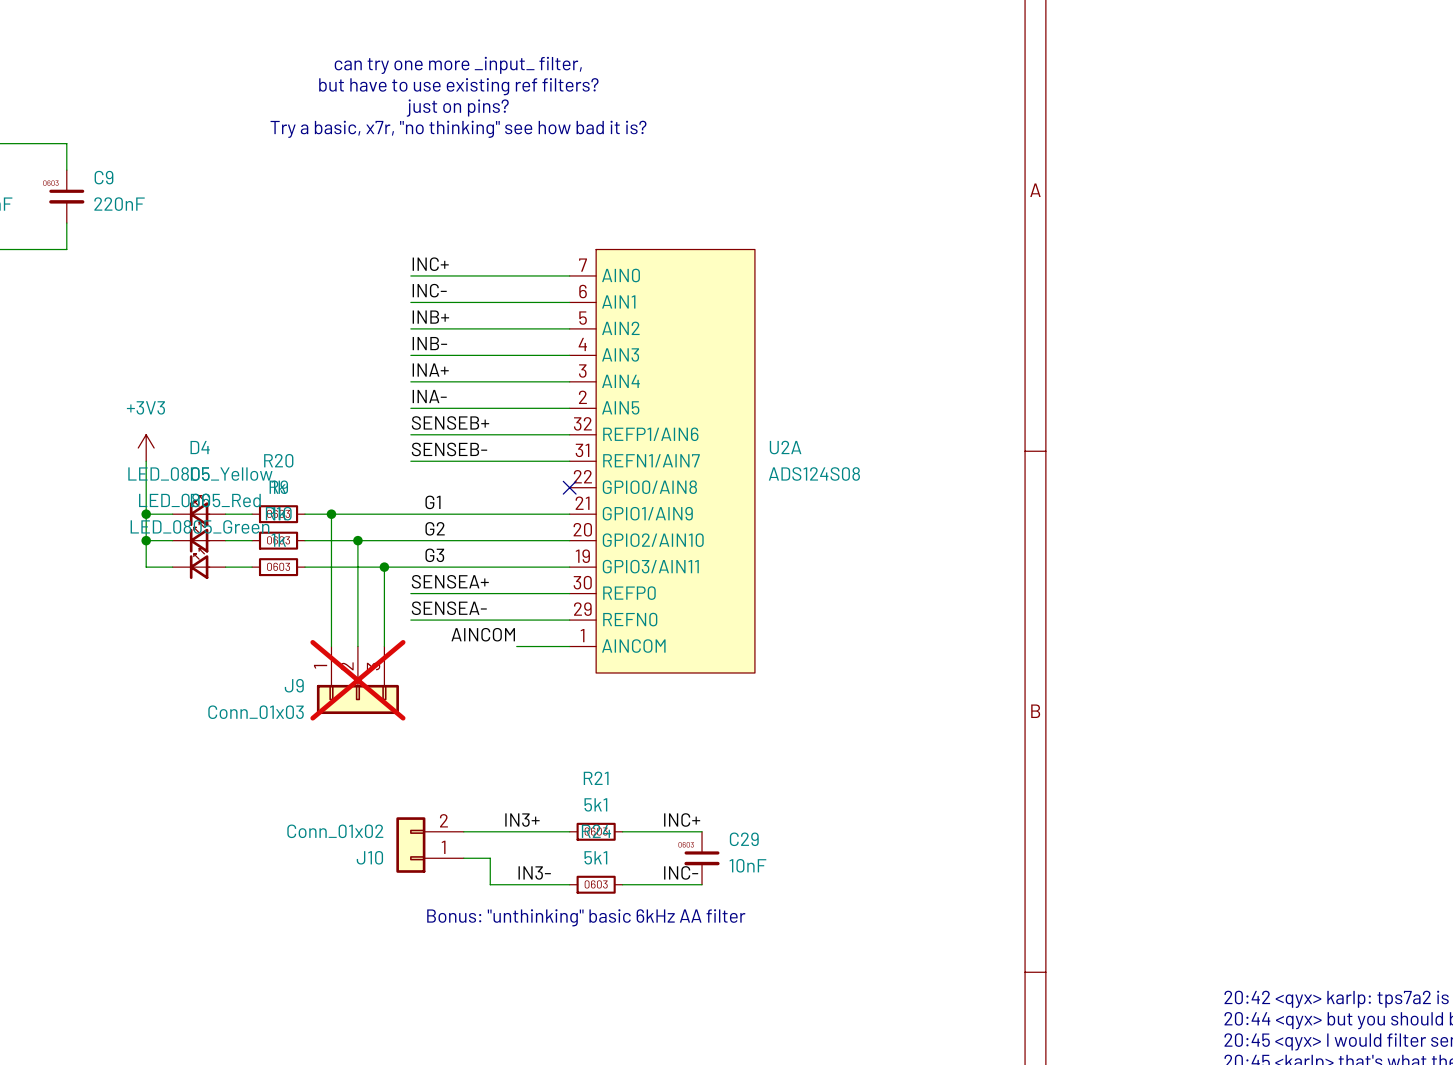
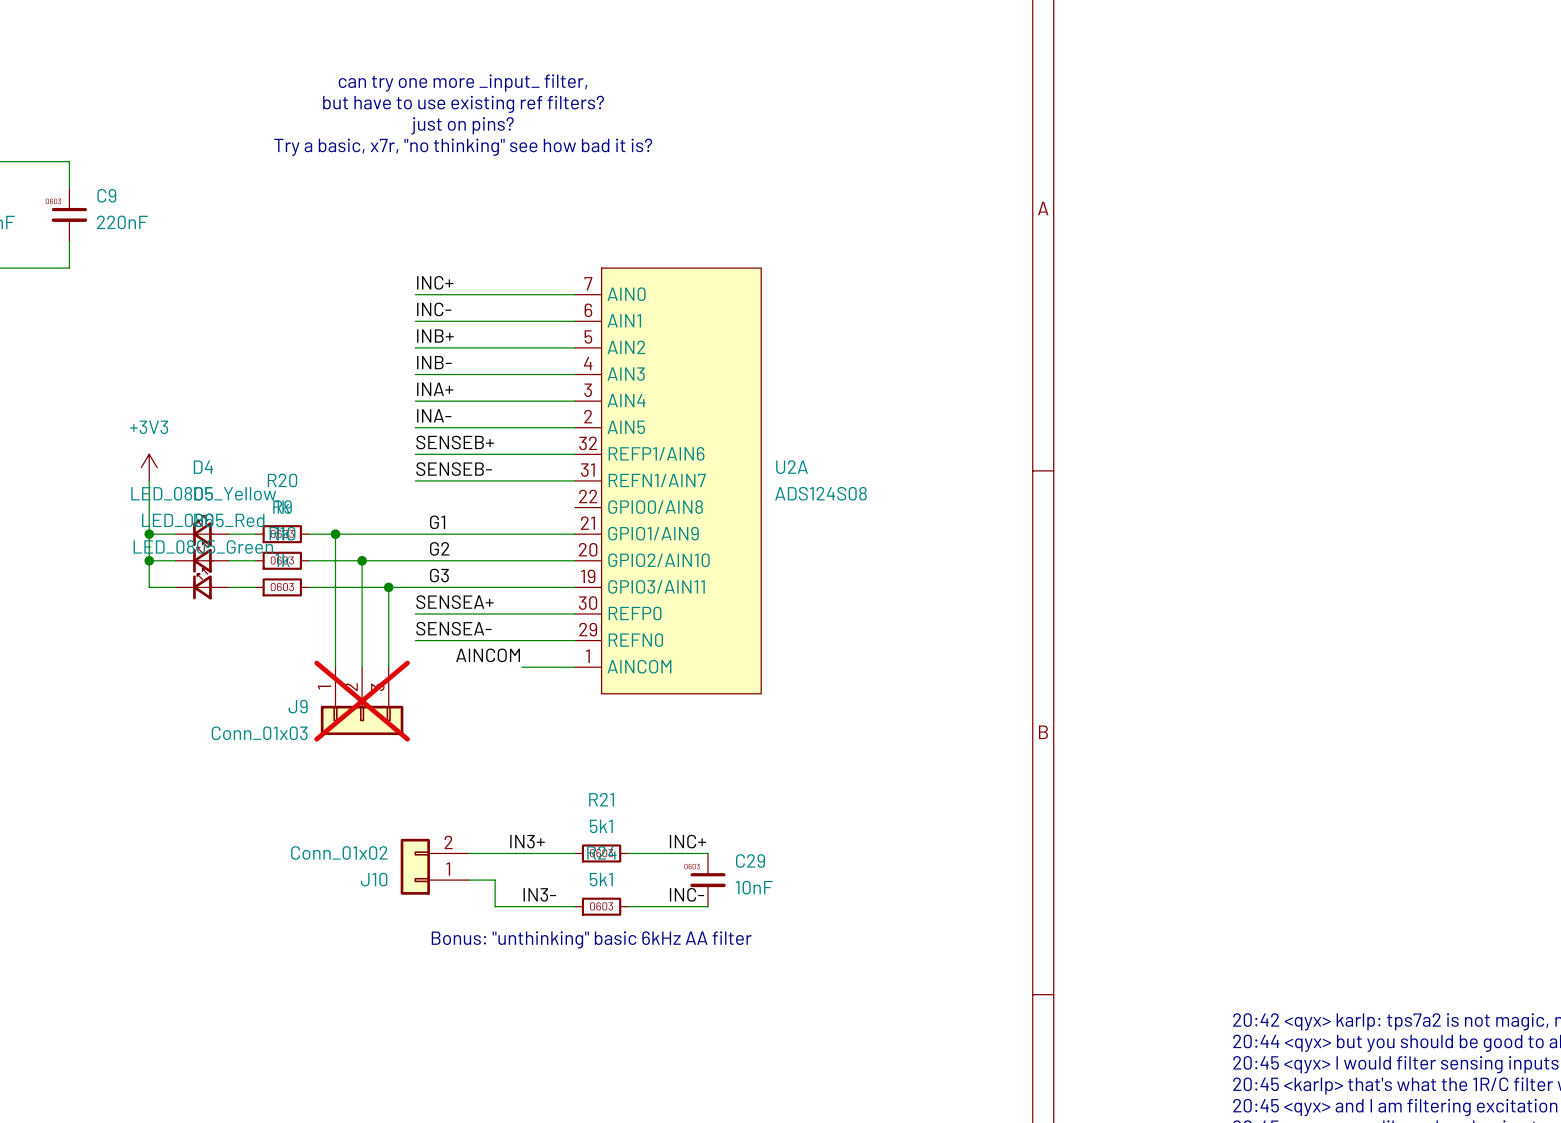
no-connect mark: (569, 487) -> none

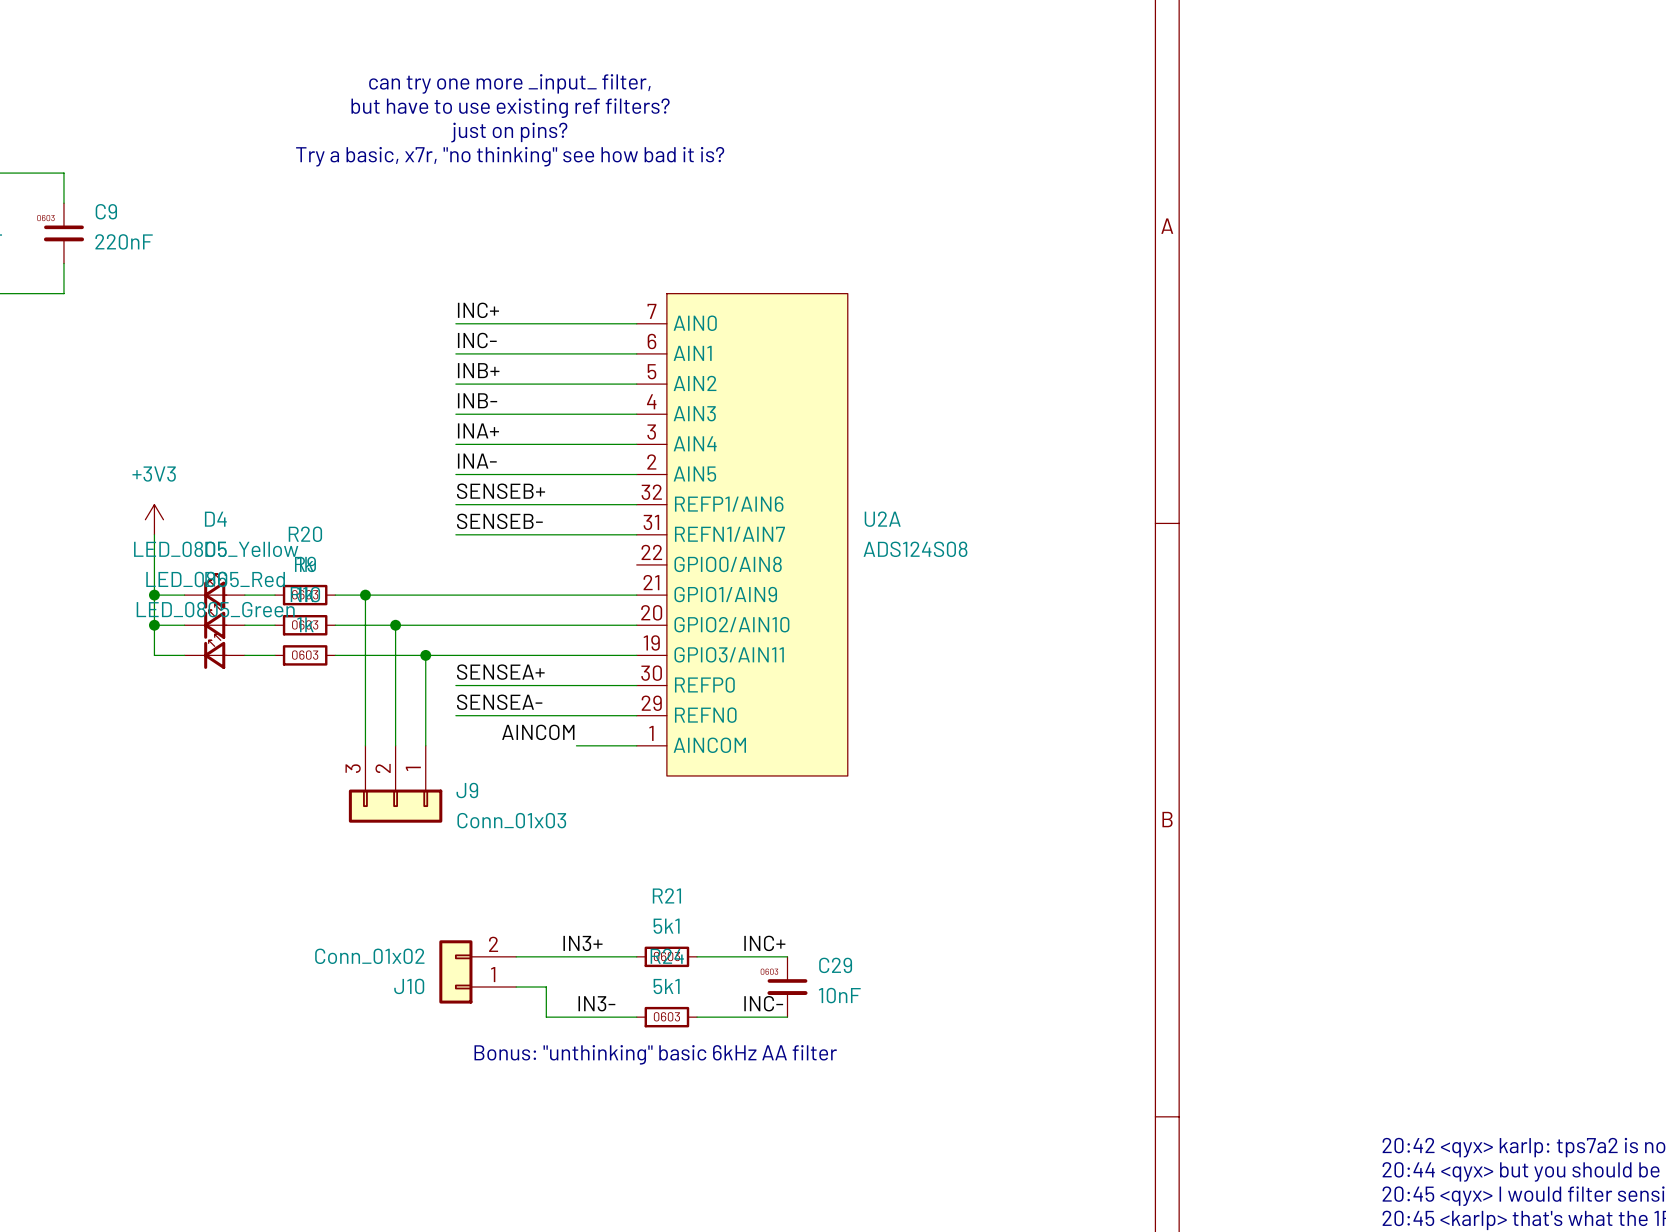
label: G1 (437, 522) -> none
label: G2 (439, 548) -> none
label: G3 (439, 575) -> none
J9 do-not-place cross: (362, 701) -> none
J9 flip: as is (362, 720) -> left-right (395, 806)

